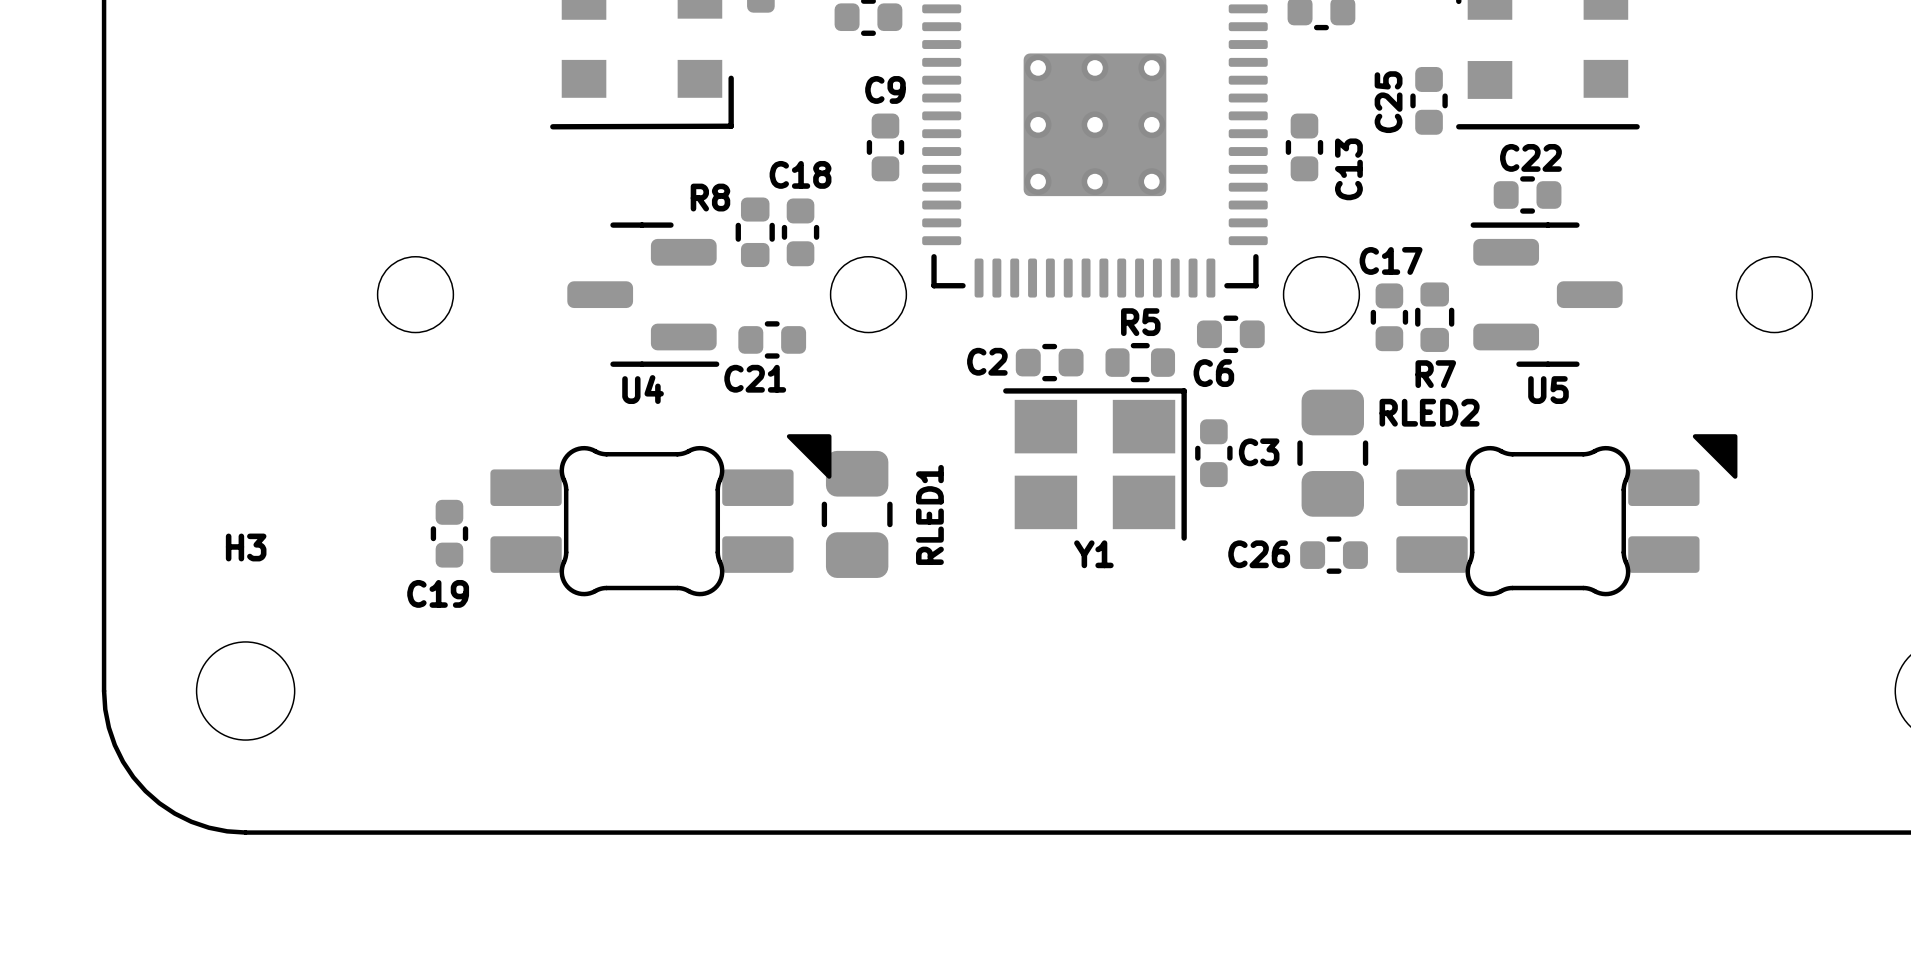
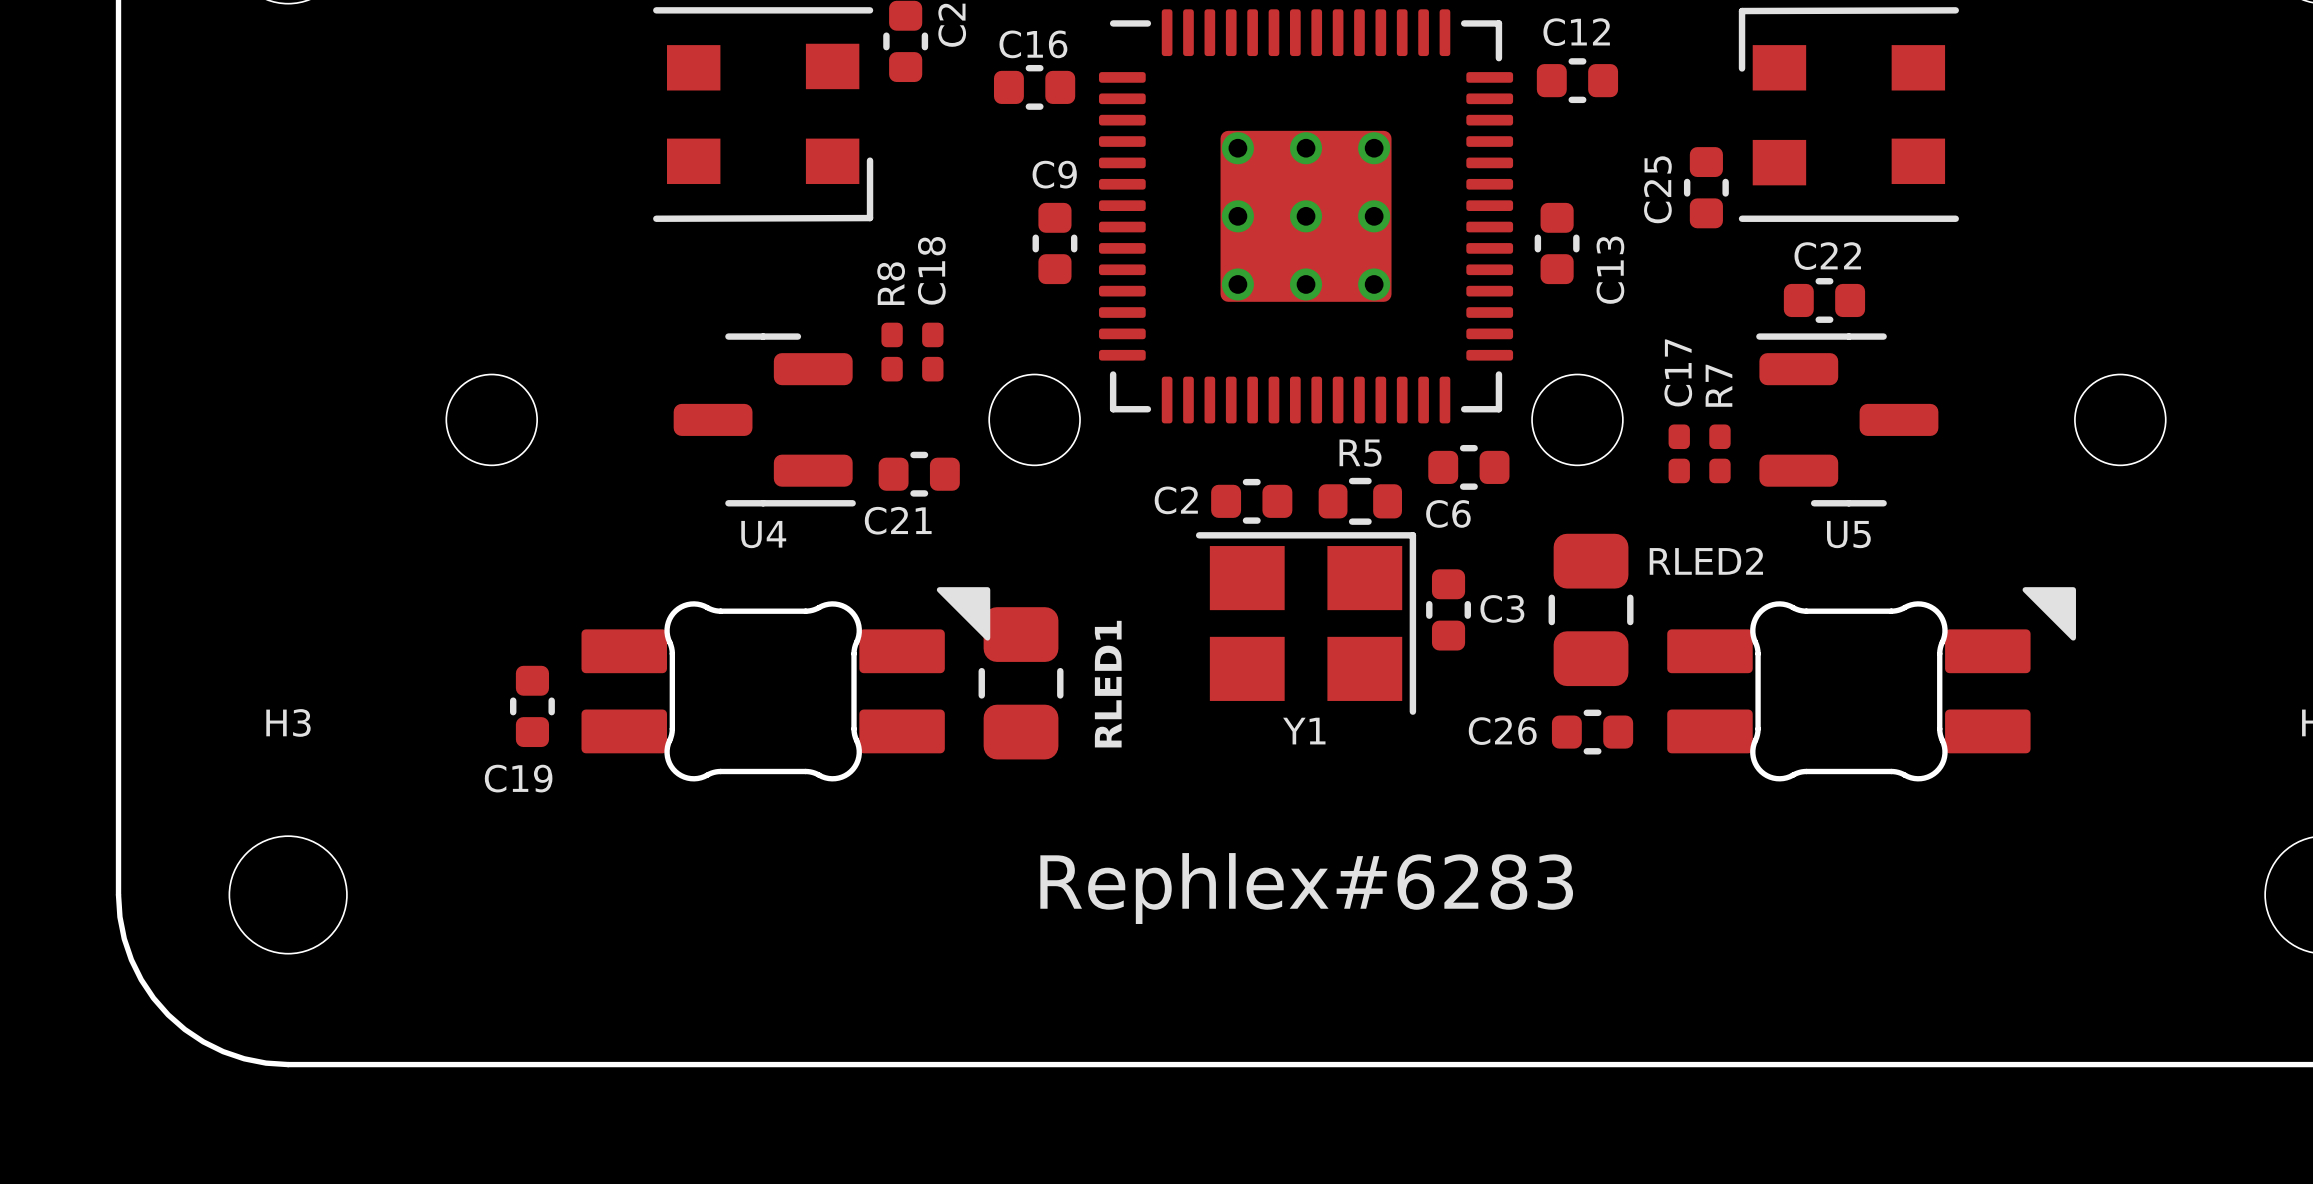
R8 footprint: [735, 197, 775, 268] -> [881, 322, 903, 382]
C18 footprint: [781, 198, 820, 267] -> [922, 322, 944, 382]
R7 footprint: [1415, 282, 1455, 352] -> [1709, 424, 1731, 484]
C17 footprint: [1370, 283, 1409, 352] -> [1668, 424, 1690, 484]
R7 name position: R7 (1435, 374) -> R7 (1718, 385)
text: none -> Rephlex#6283 (1306, 888)

